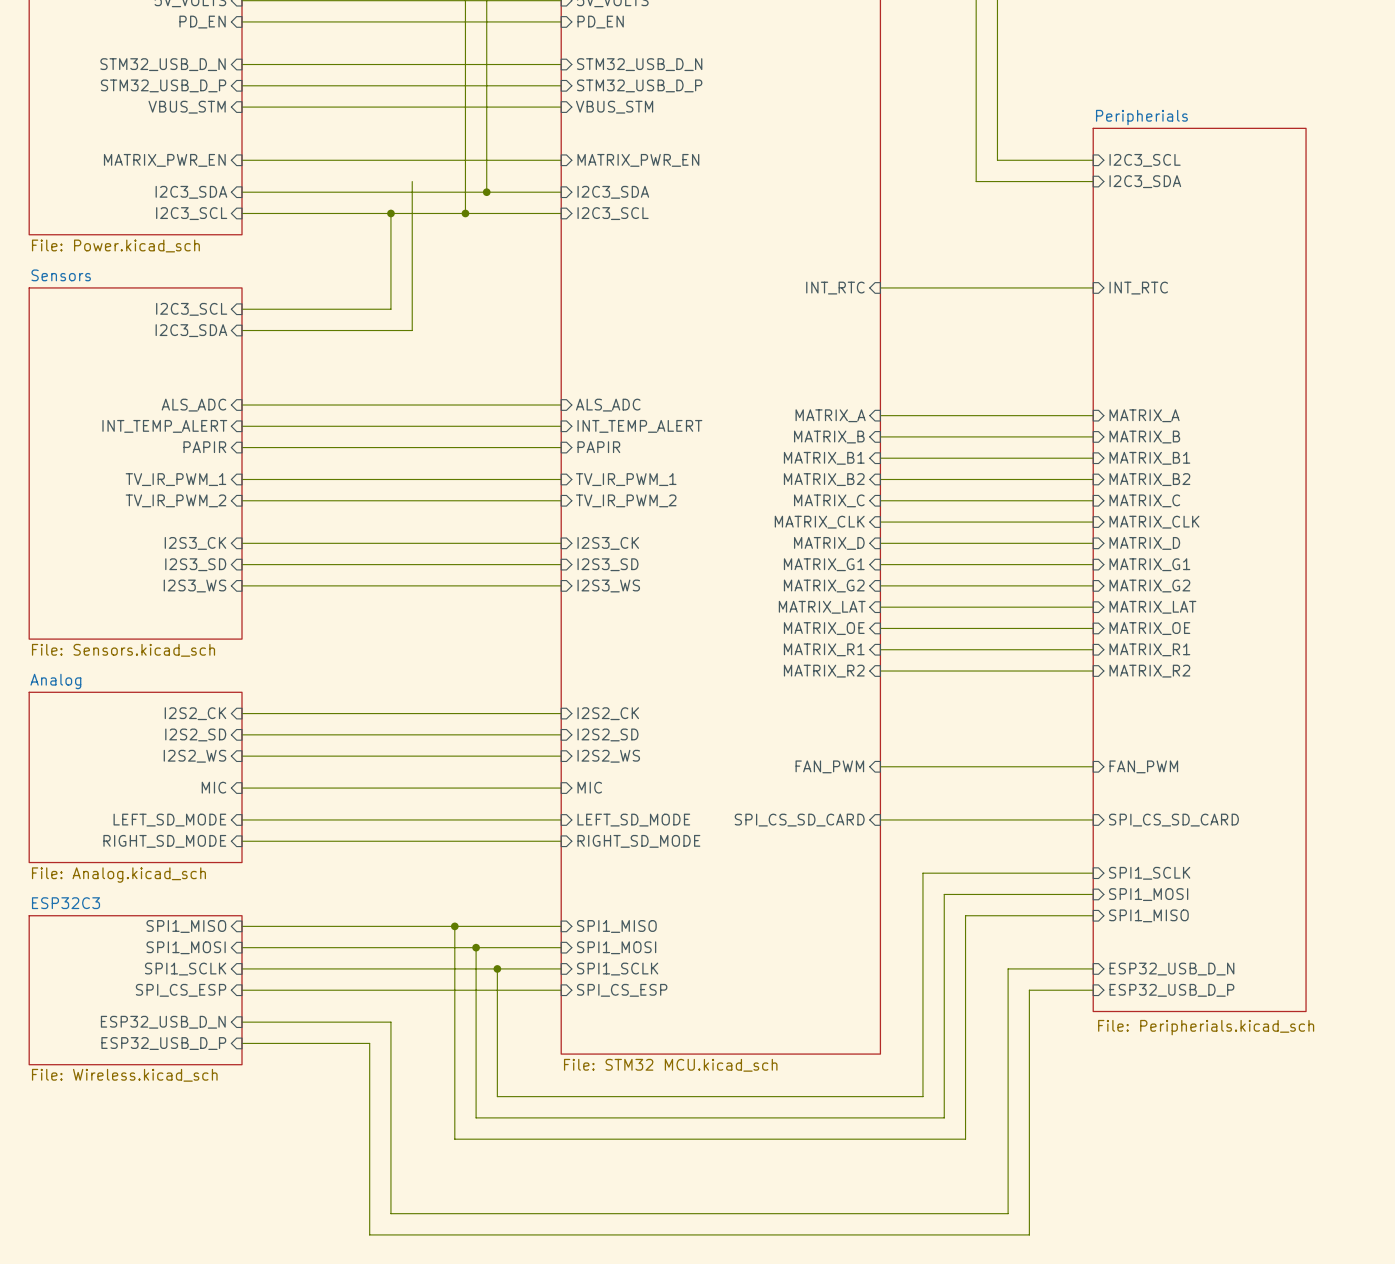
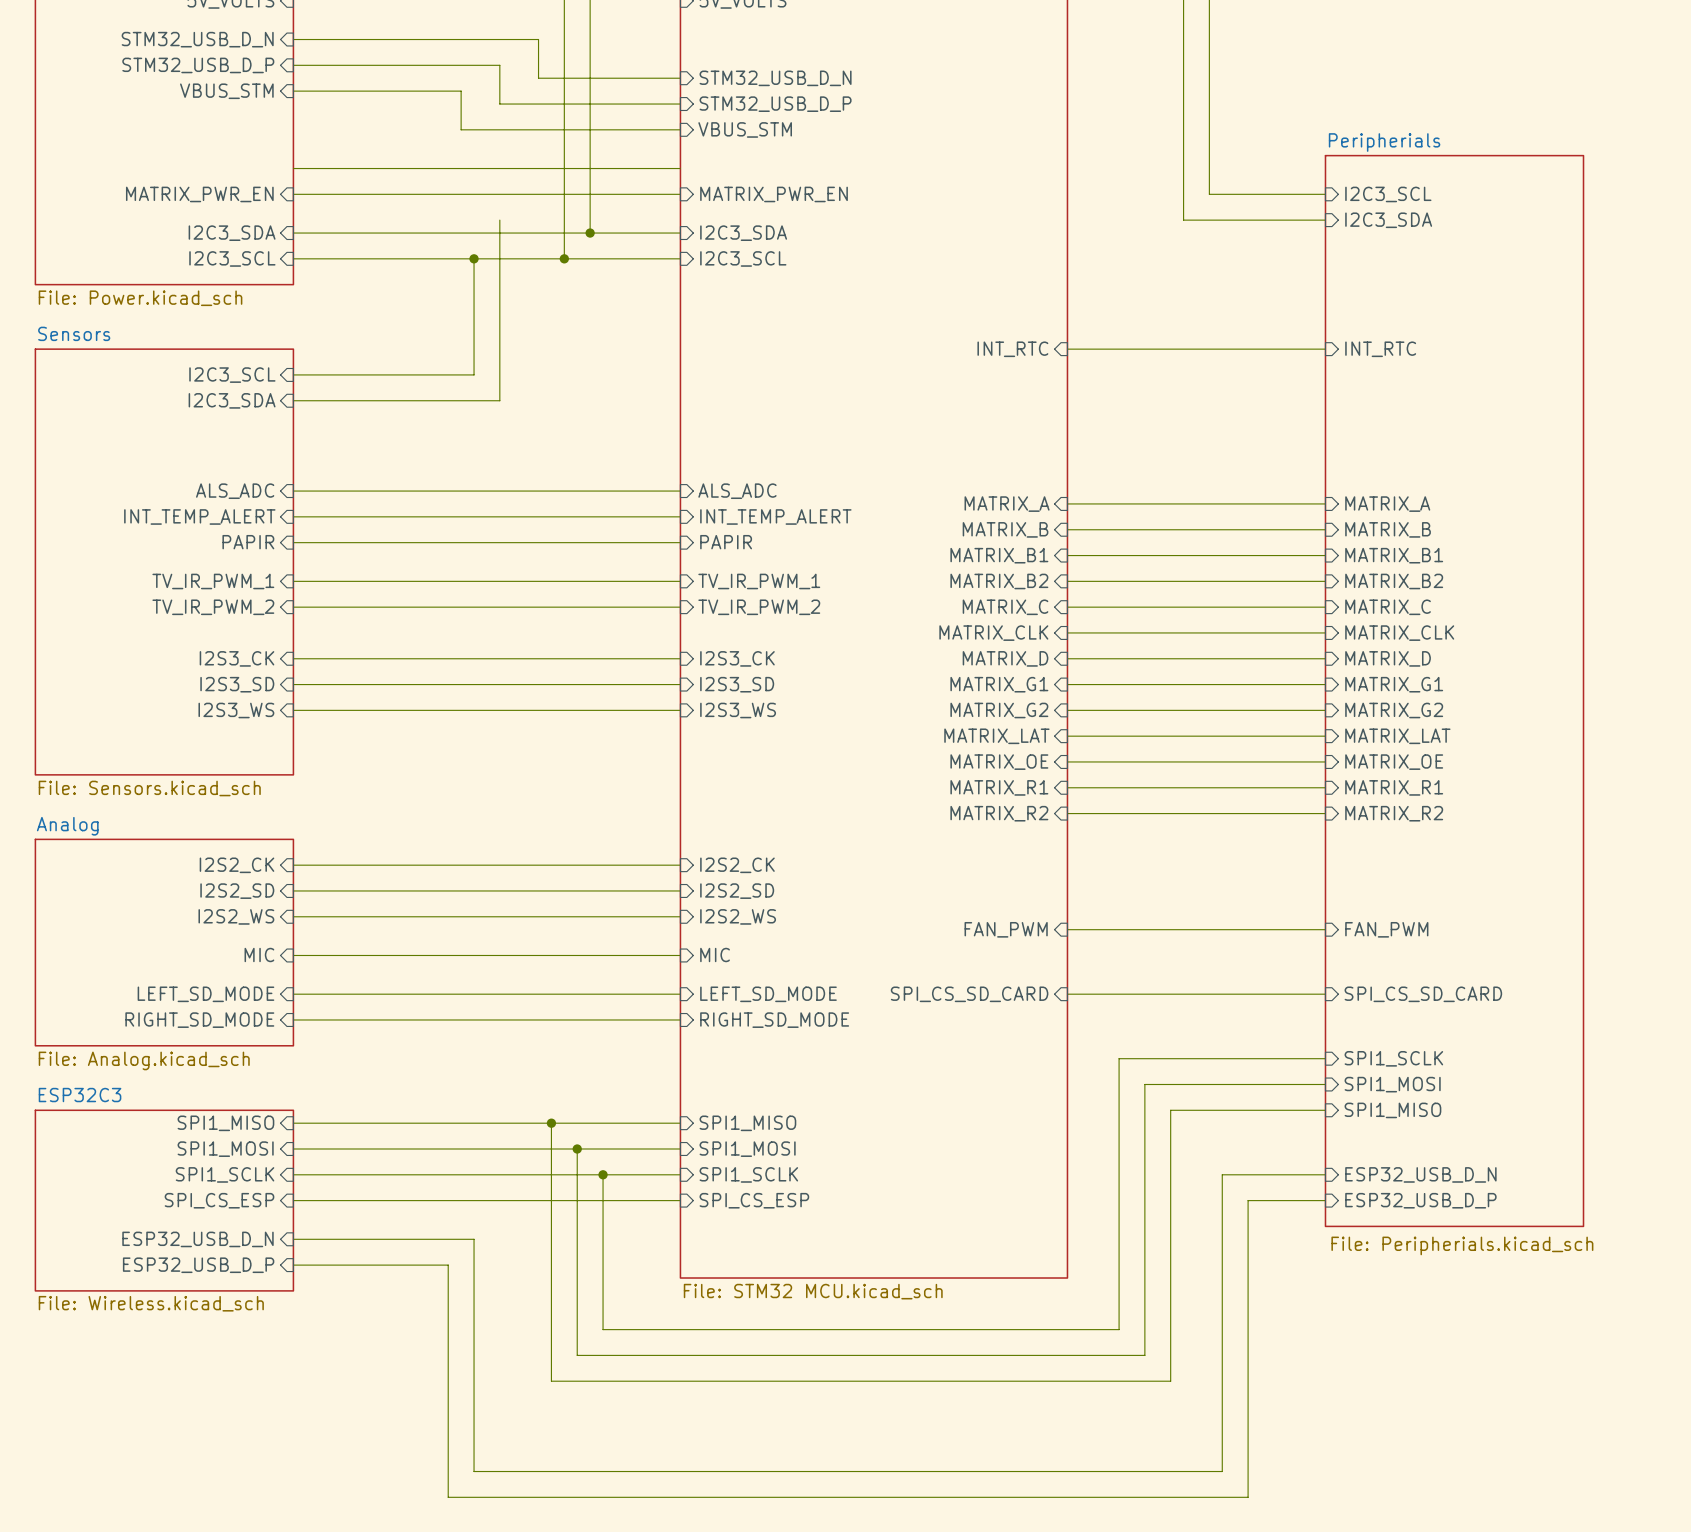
wire: (242, 0) (561, 0) -> none
wire: (242, 21) (561, 21) -> (293, 168) (680, 168)
sheet pin: PD_EN (202, 22) -> none
sheet pin: PD_EN (600, 22) -> none
sheet pin position: STM32_USB_D_N (163, 64) -> STM32_USB_D_N (197, 39)
wire: (242, 64) (444, 64) -> (293, 39) (538, 39) (538, 78)
sheet pin position: STM32_USB_D_P (163, 85) -> STM32_USB_D_P (198, 65)
wire: (242, 85) (412, 85) -> (293, 65) (499, 65) (499, 104)
sheet pin position: VBUS_STM (187, 107) -> VBUS_STM (226, 91)
wire: (242, 107) (380, 107) -> (293, 91) (461, 91) (461, 129)

